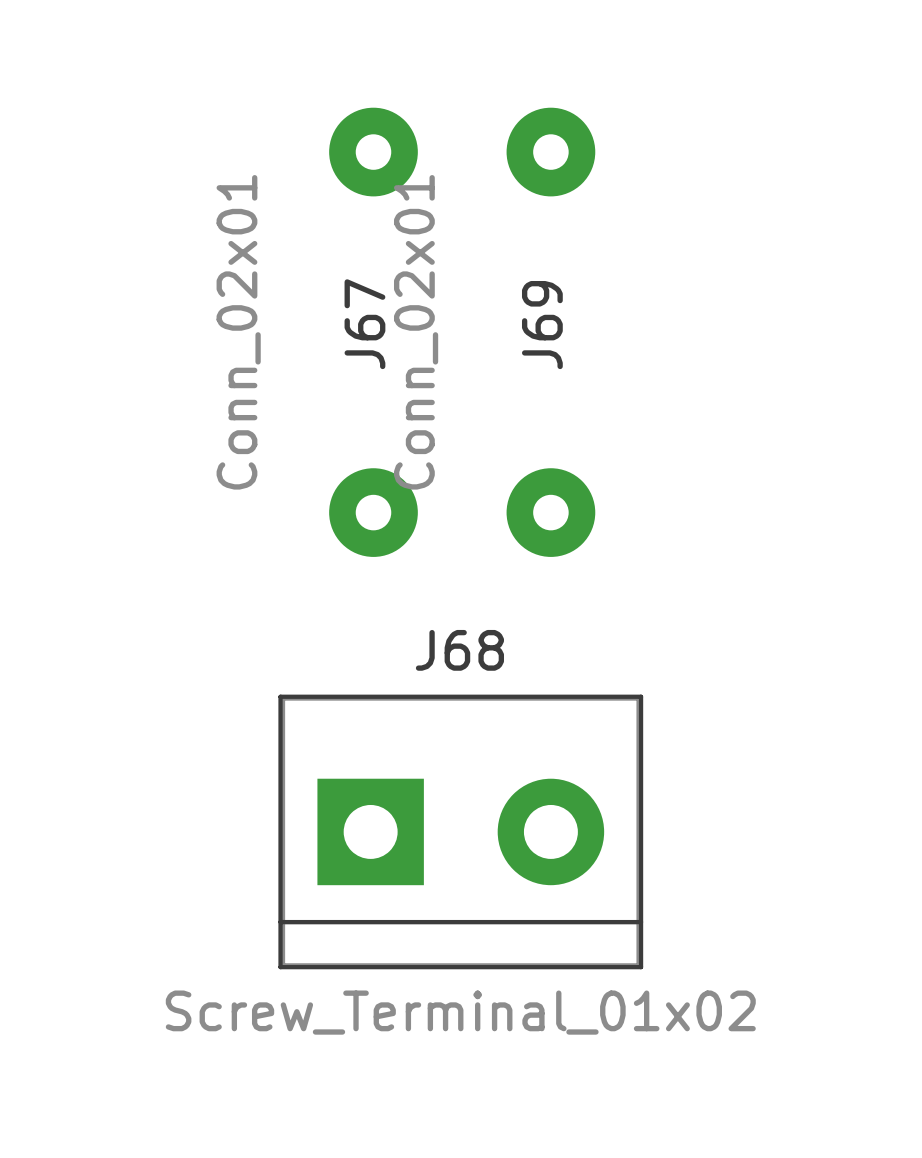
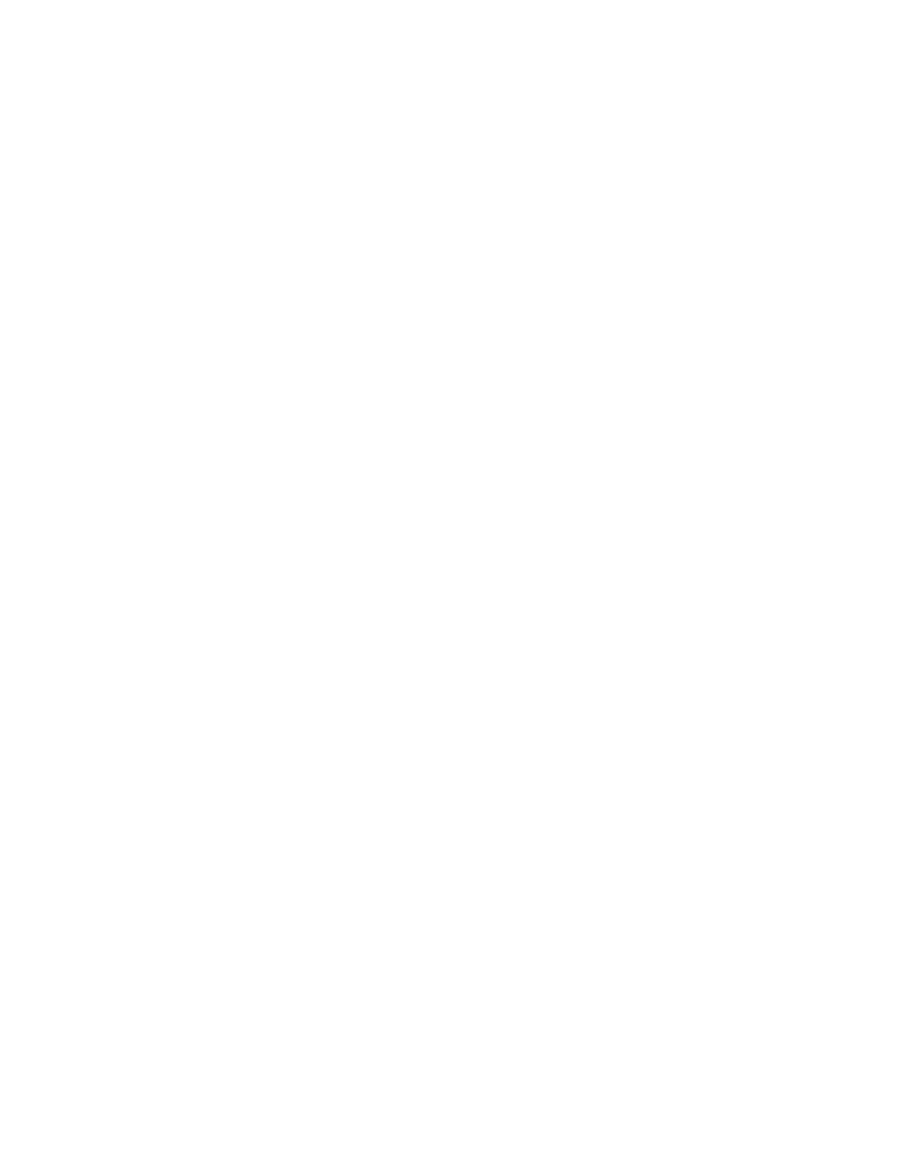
J67: Conn_02x01 (373, 332) -> none
J69: Conn_02x01 (550, 332) -> none
J68: Screw_Terminal_01x02 (460, 831) -> none

